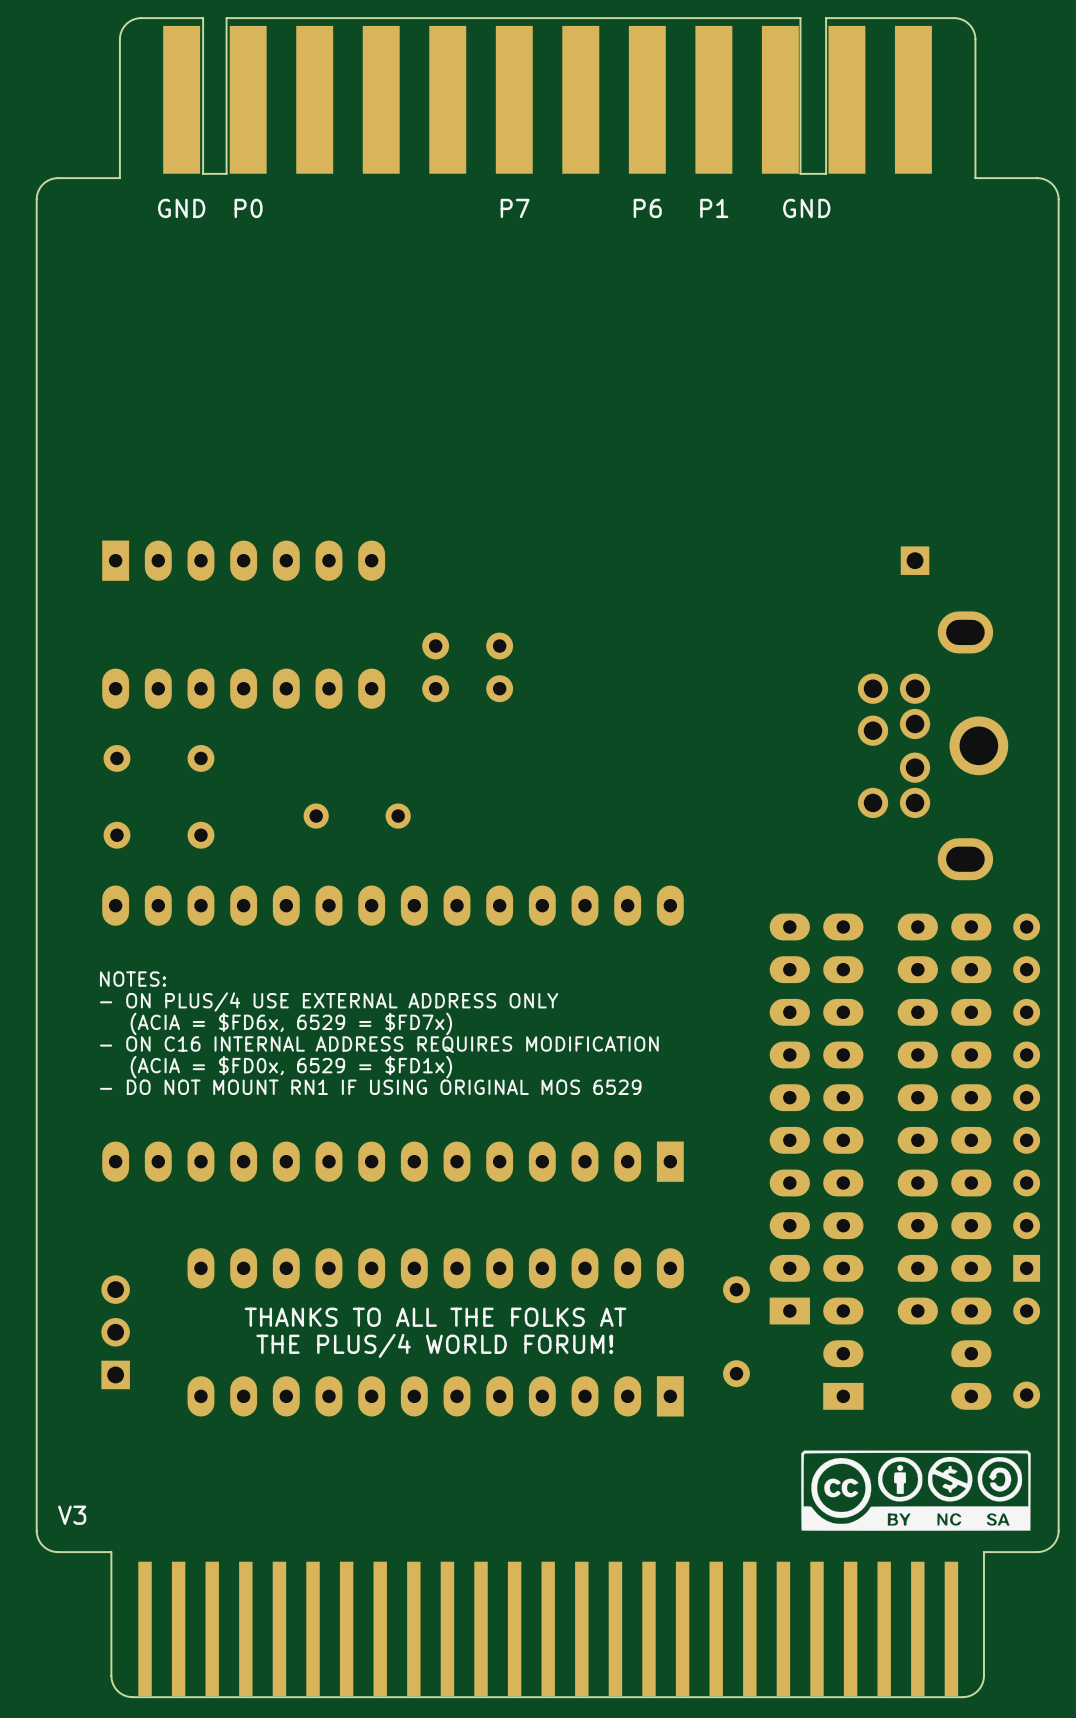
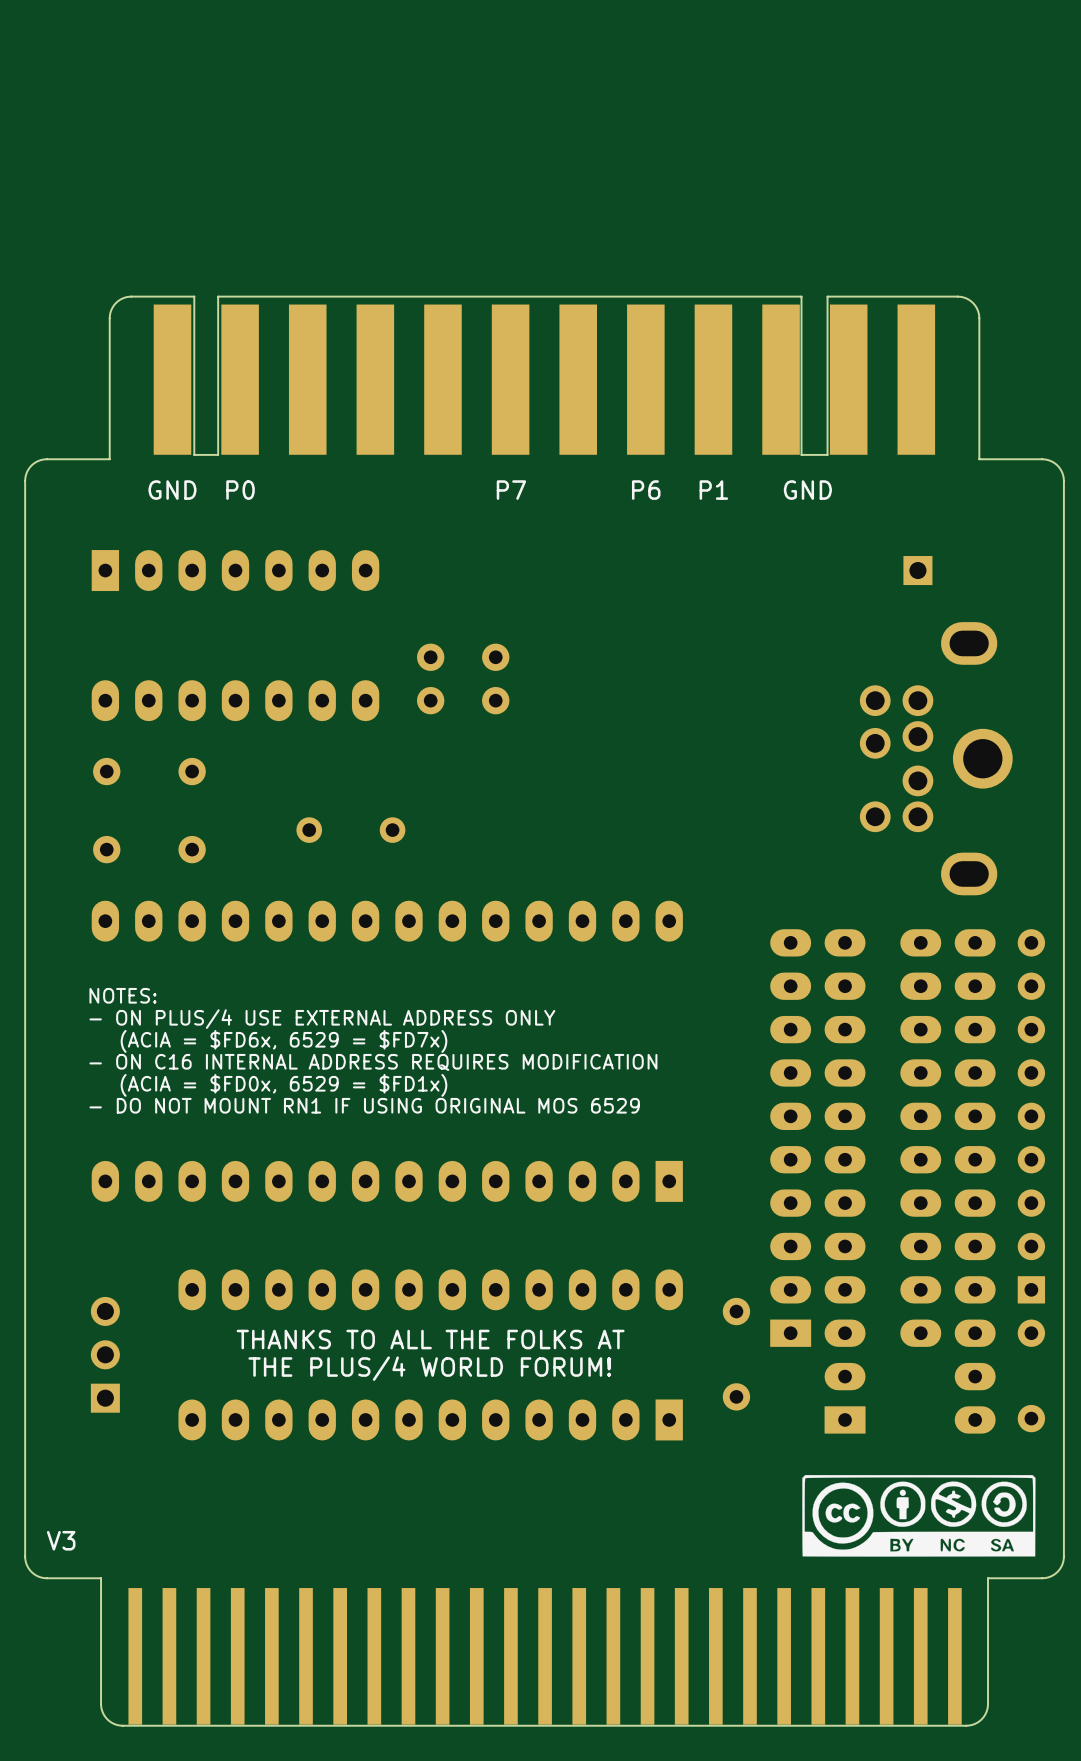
part position: (547, 99) -> (544, 379)
text position: GND (181, 208) -> GND (172, 490)
text position: P0 (248, 208) -> P0 (240, 490)
text position: P7 (515, 208) -> P7 (511, 490)
text position: P6 (647, 208) -> P6 (646, 490)
text position: P1 (714, 208) -> P1 (713, 490)
text position: GND (806, 208) -> GND (807, 490)
board edge: (1058, 472) (1057, 193) (1052, 184) (1040, 178) (975, 178) (975, 36) (969, 24) (962, 19) (954, 18) (826, 18) (826, 173) (800, 173) (800, 18) (226, 18) (226, 173) (203, 173) (203, 18) (141, 18) (130, 20) (122, 28) (120, 36) (119, 178) (55, 178) (45, 182) (37, 193) (36, 472) -> (1063, 480) (1059, 467) (1047, 459) (979, 459) (979, 315) (976, 307) (970, 301) (957, 296) (827, 296) (827, 454) (801, 454) (801, 296) (218, 296) (218, 454) (194, 454) (194, 296) (128, 296) (116, 302) (109, 315) (109, 459) (41, 459) (29, 467) (25, 480)

